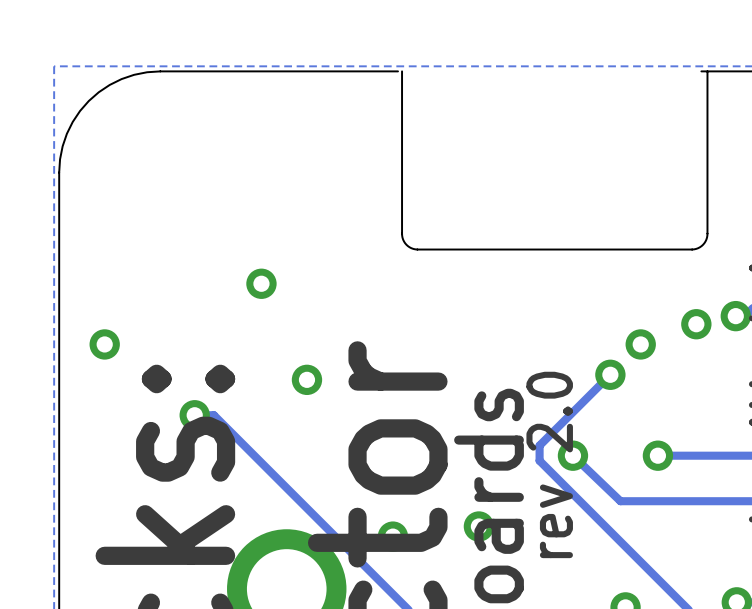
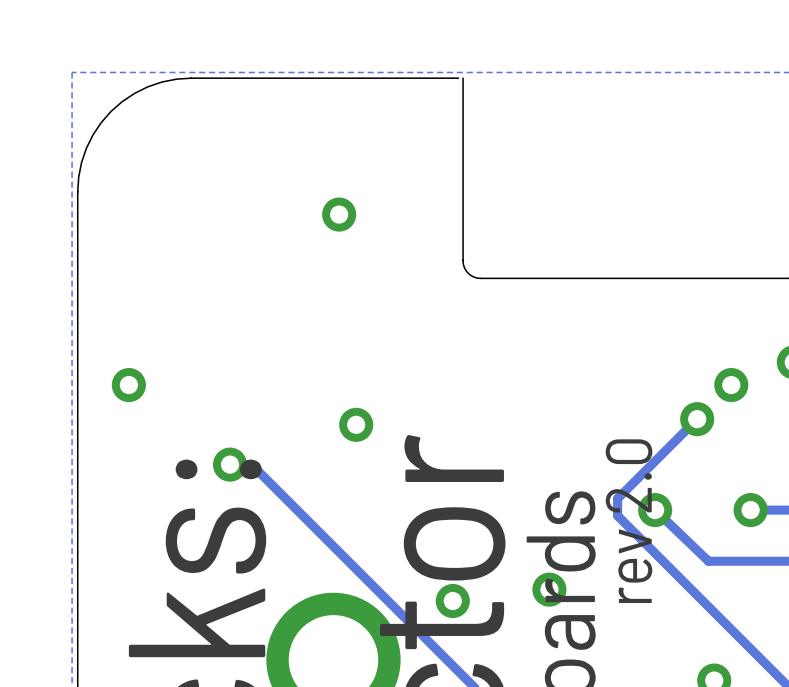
via position: (261, 283) -> (339, 214)

